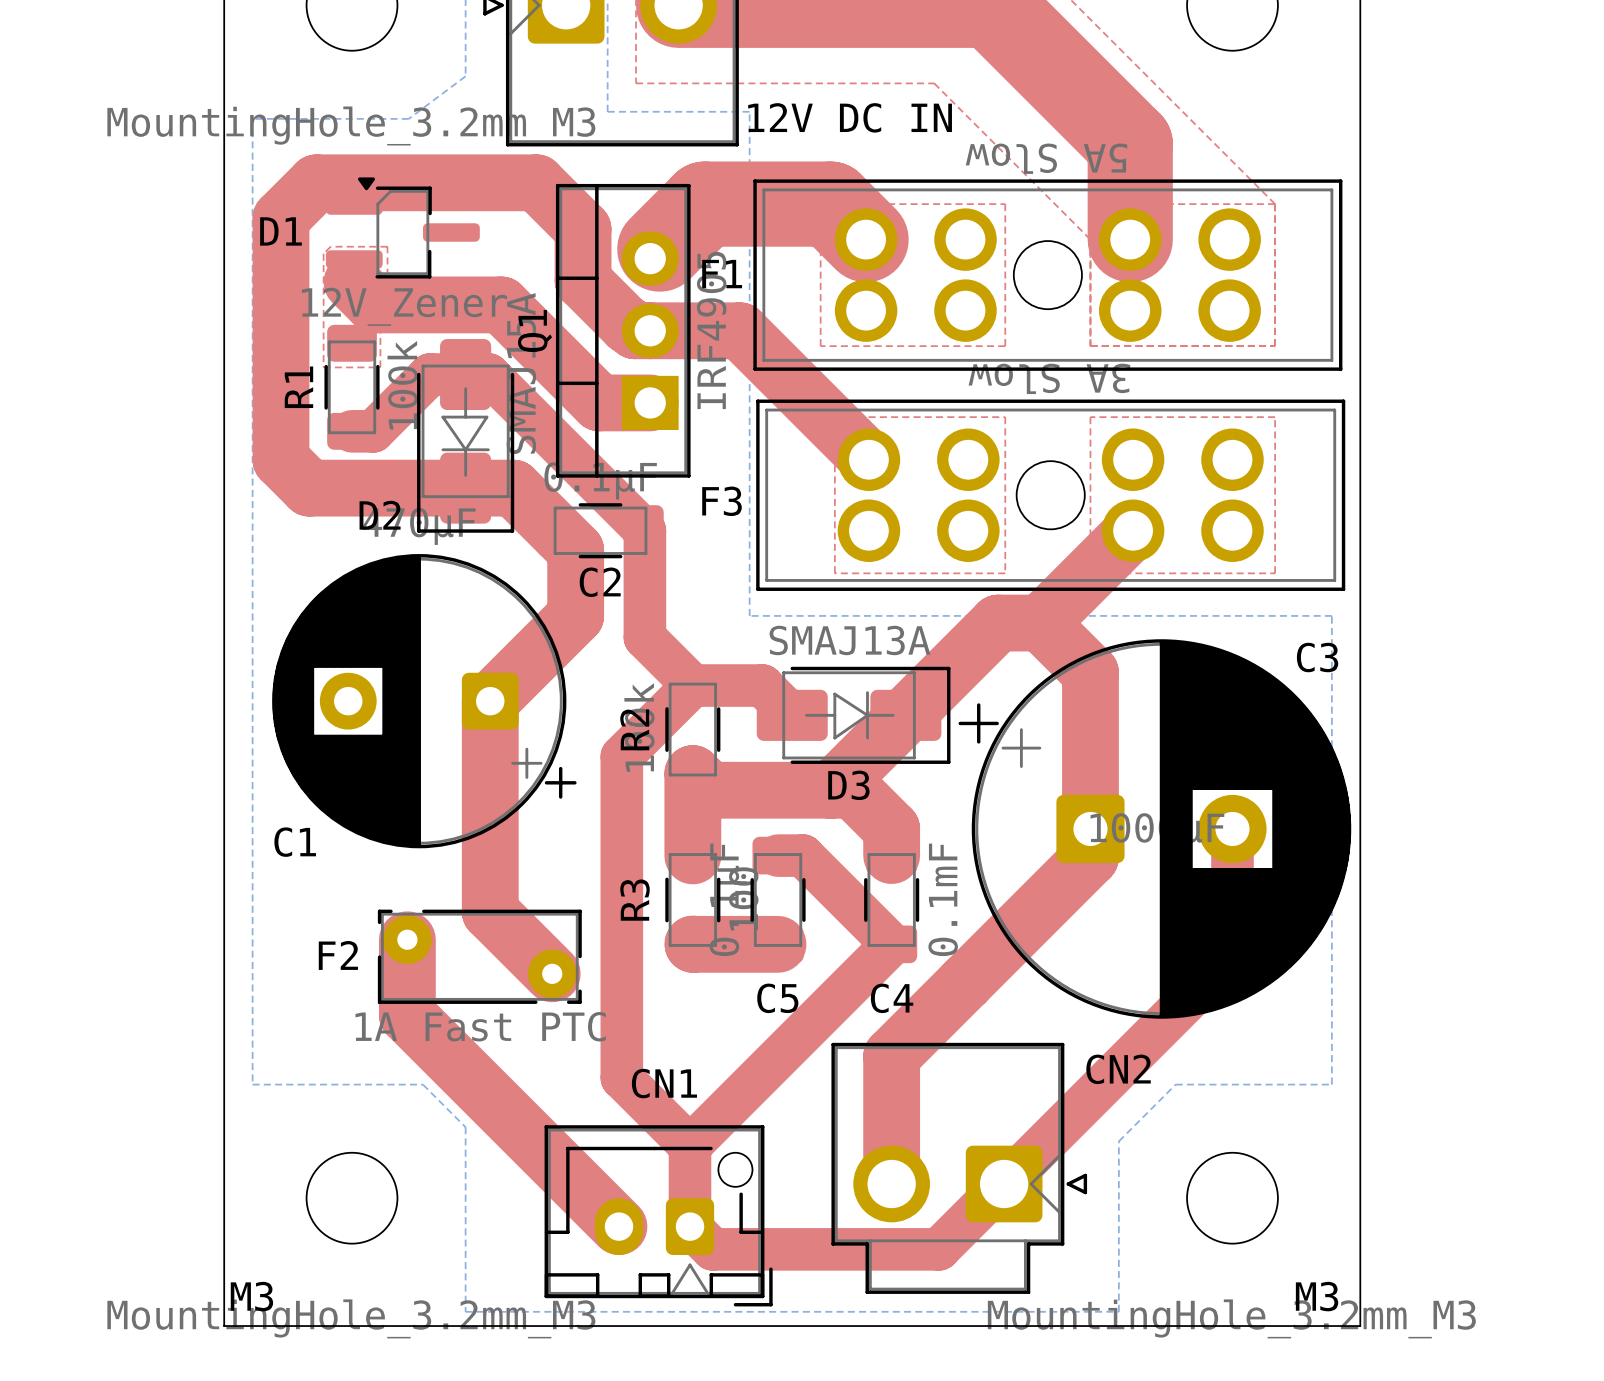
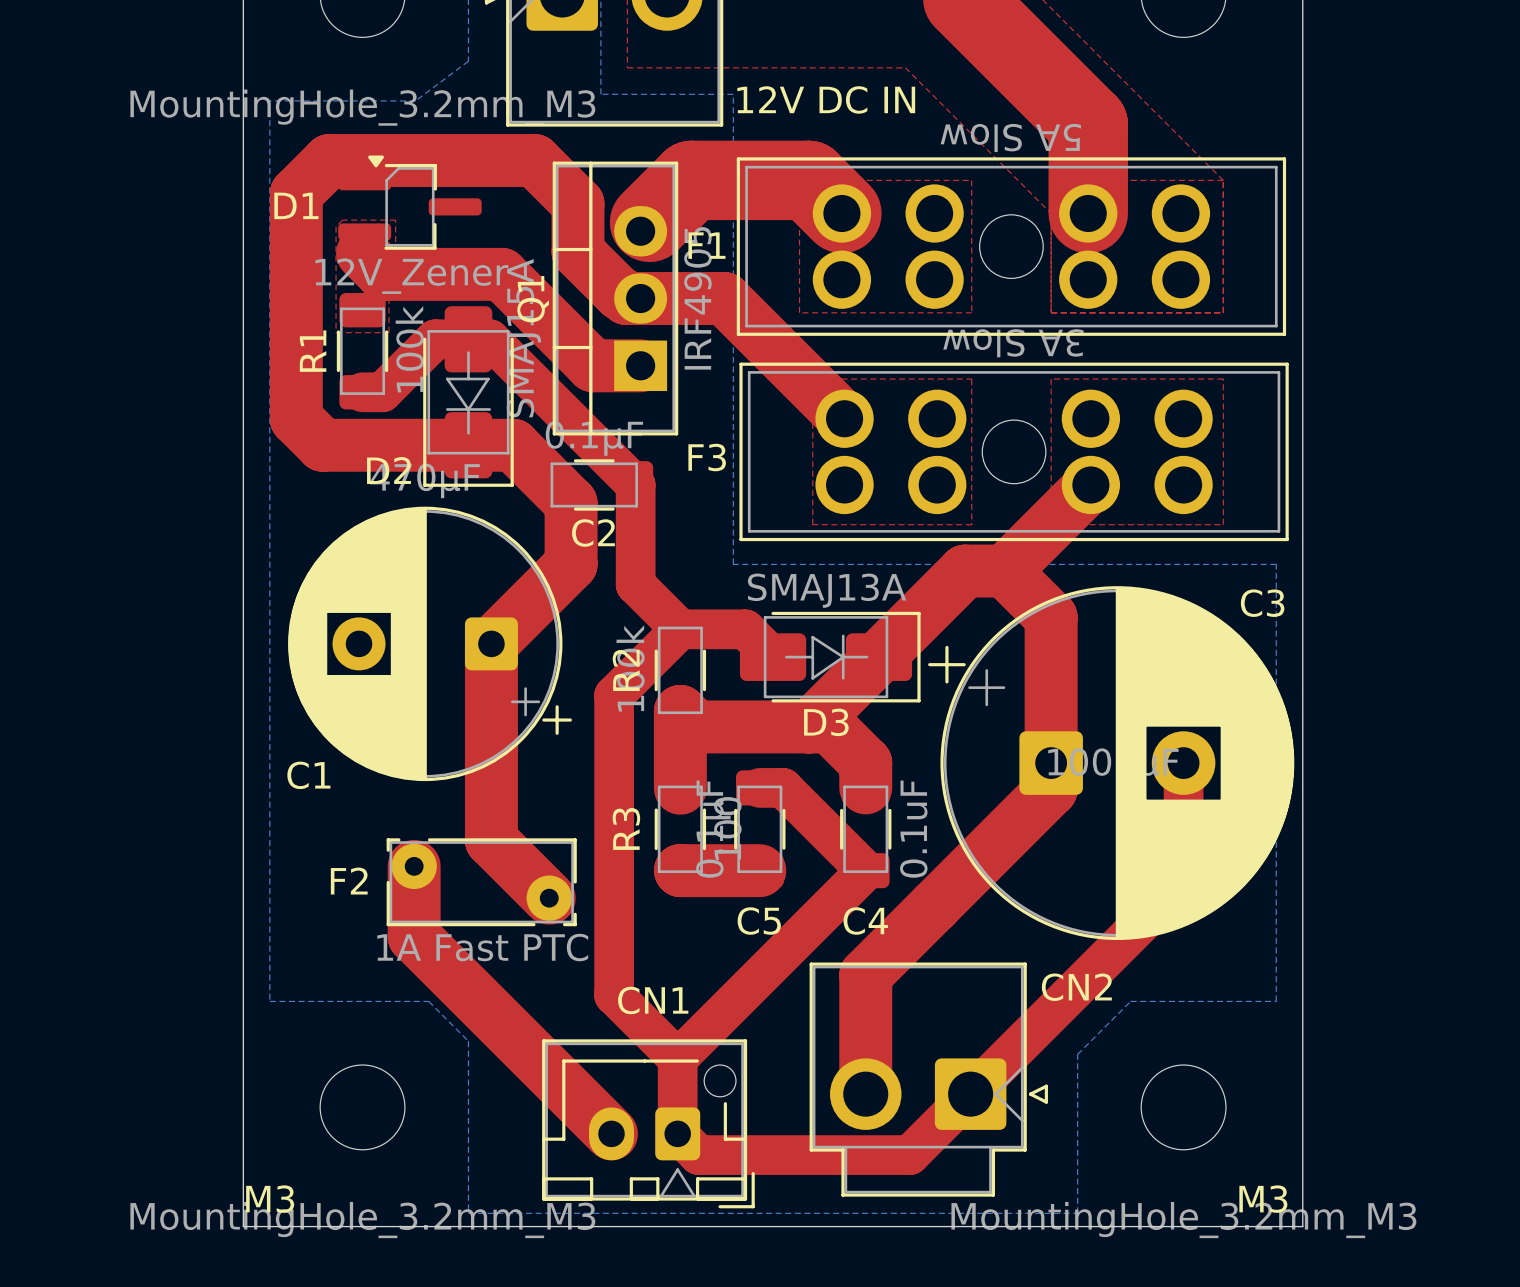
C4 value: 0.1mF (943, 899) -> 0.1uF (913, 829)

